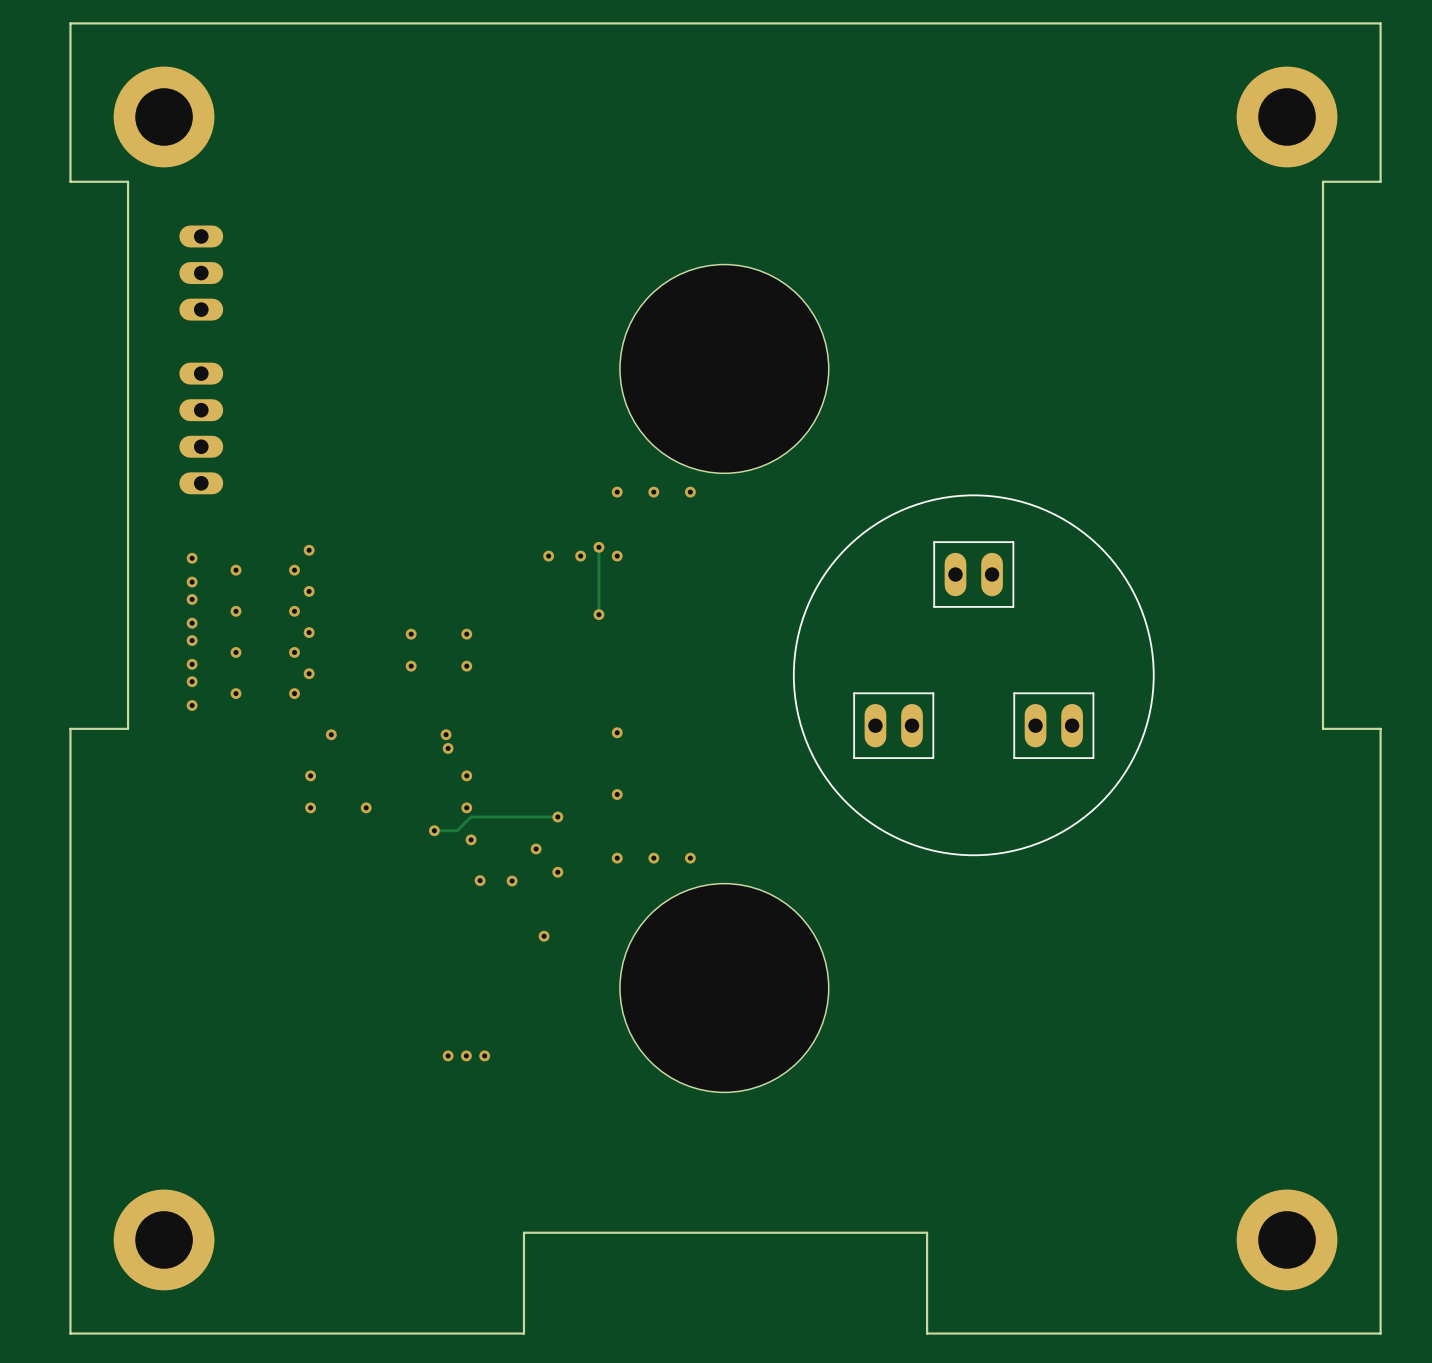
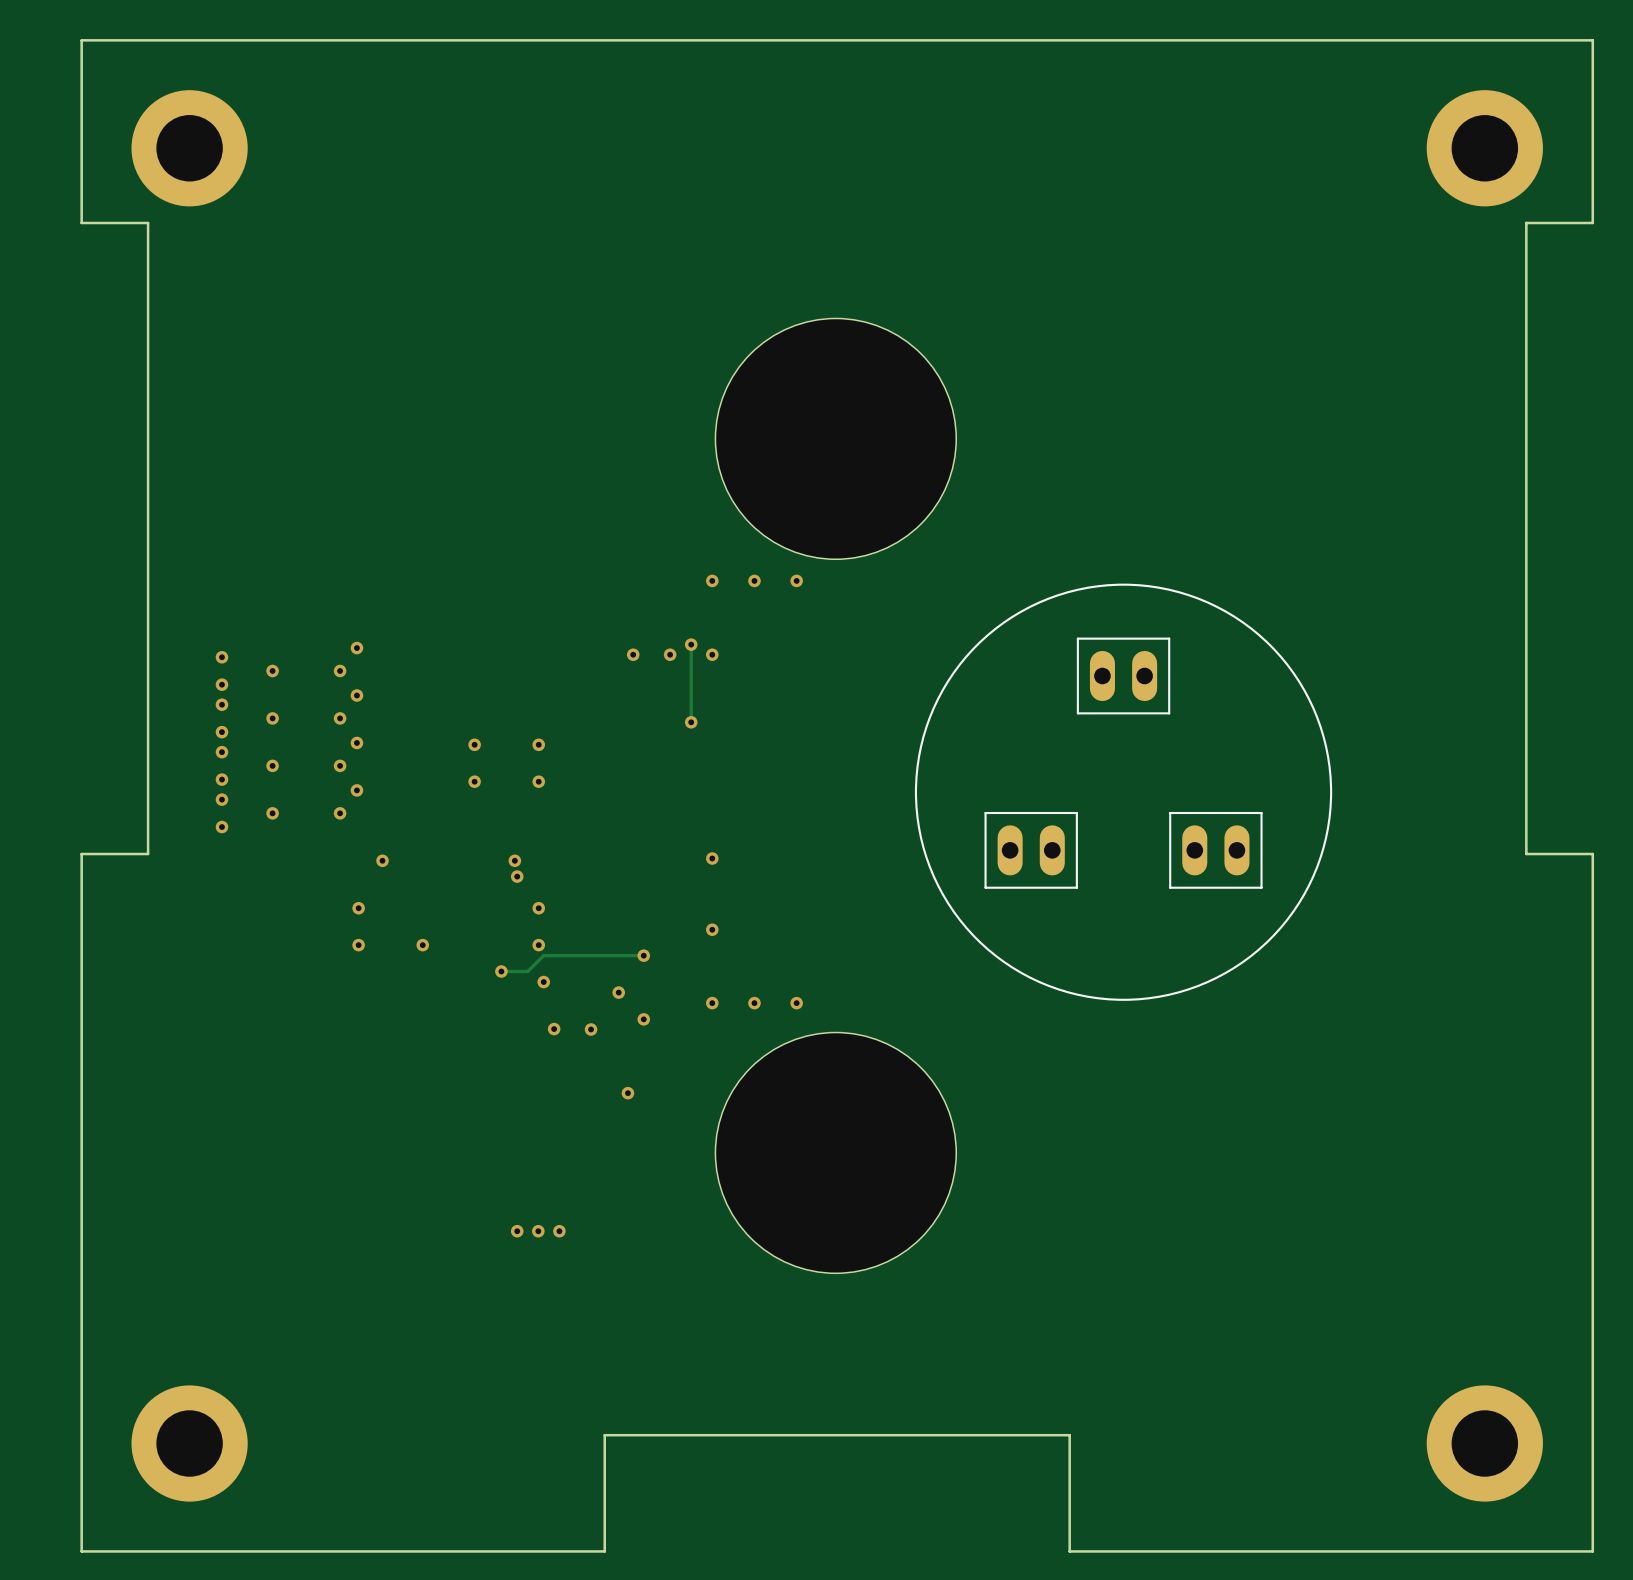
part: (201, 273) -> none
part: (201, 428) -> none

